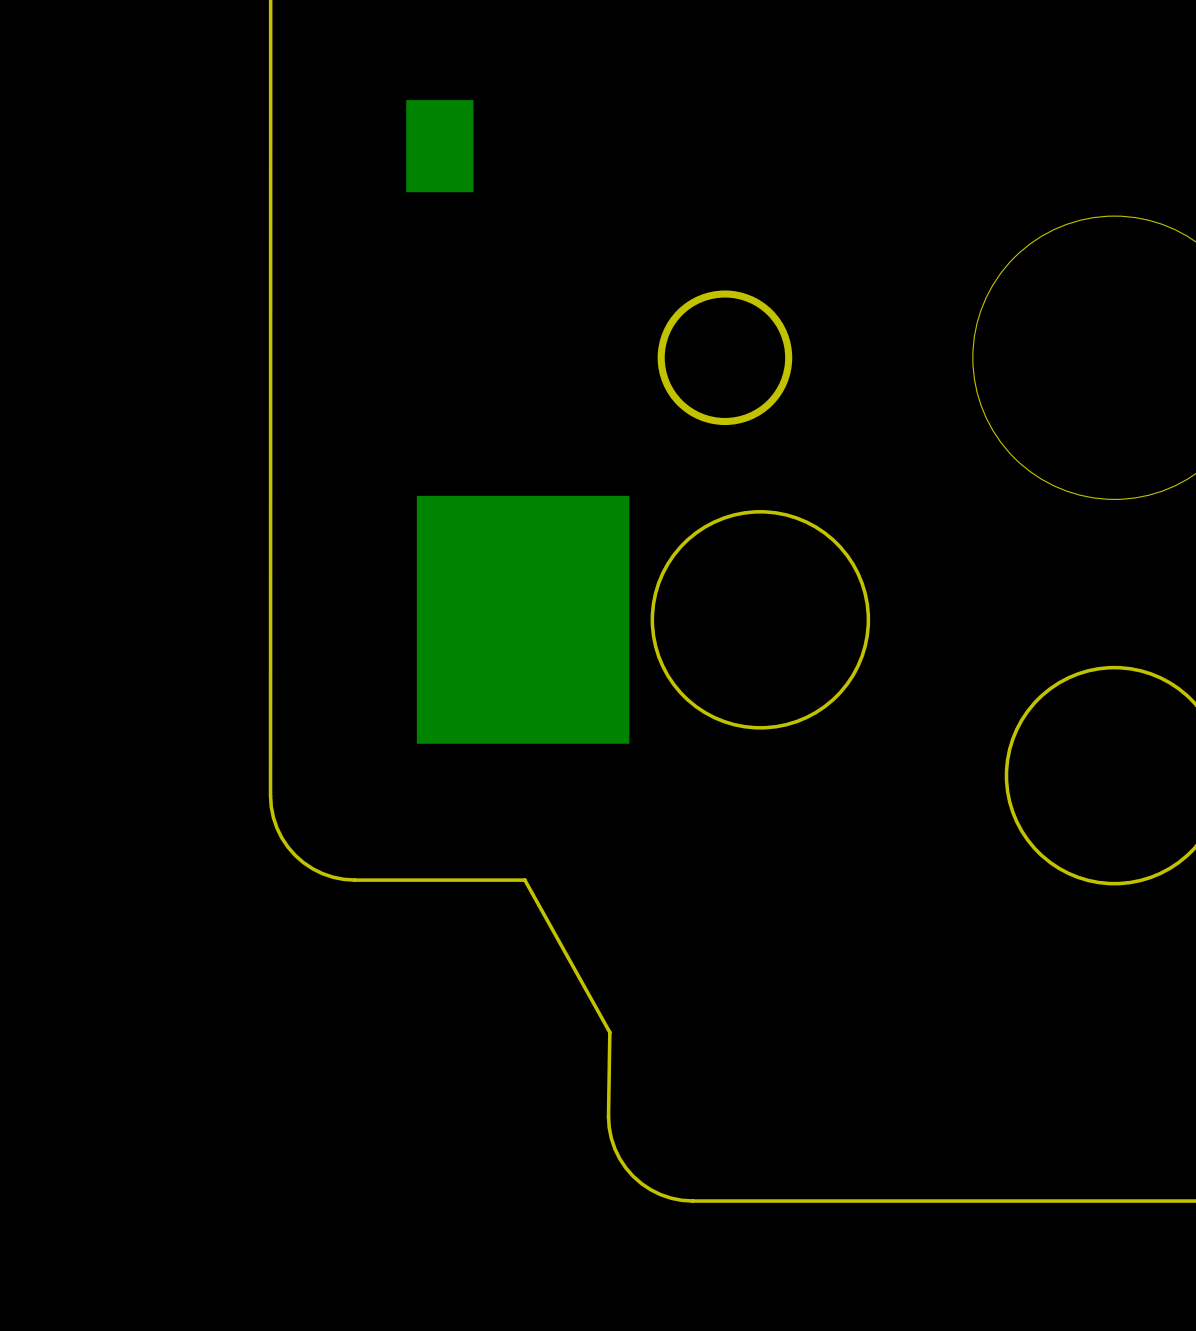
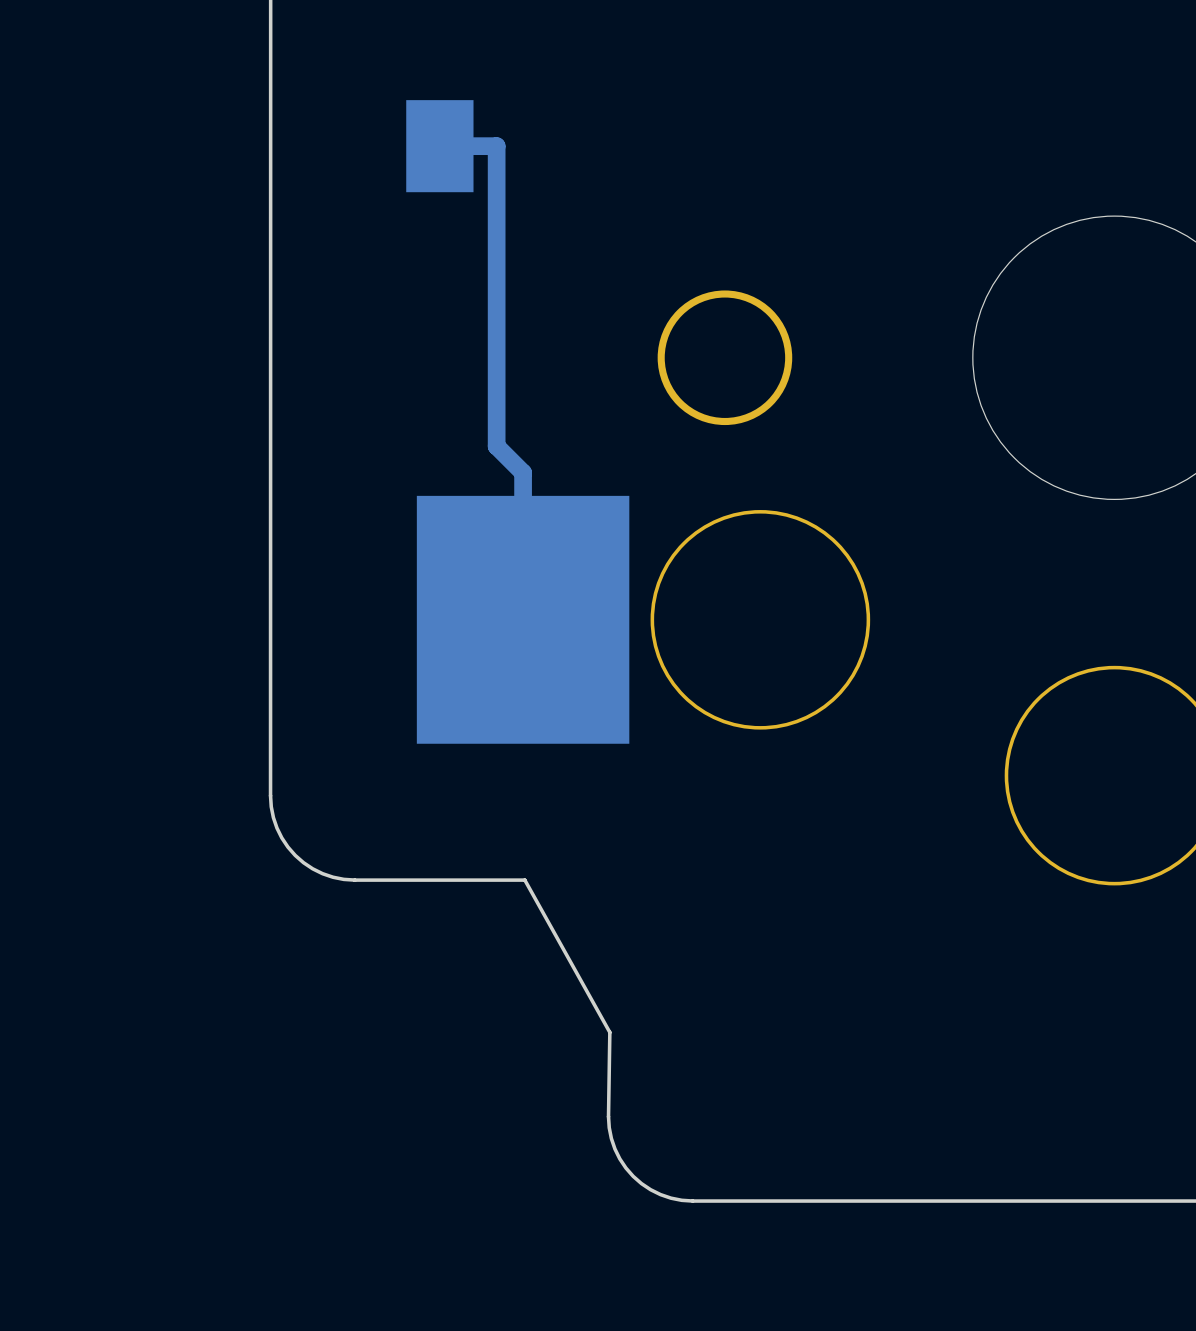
bottom track: none -> (439, 146) (496, 146) (496, 446) (523, 472) (523, 619)

